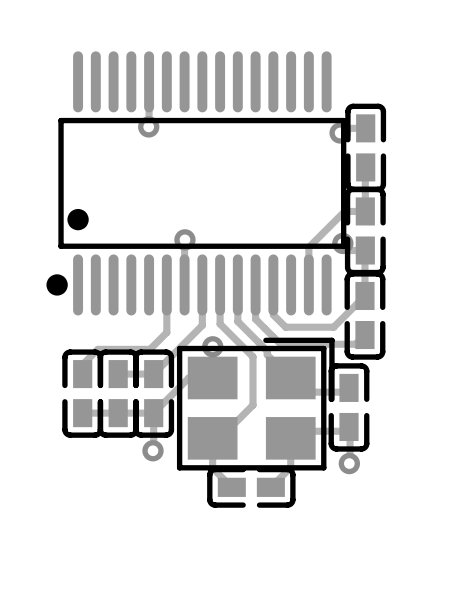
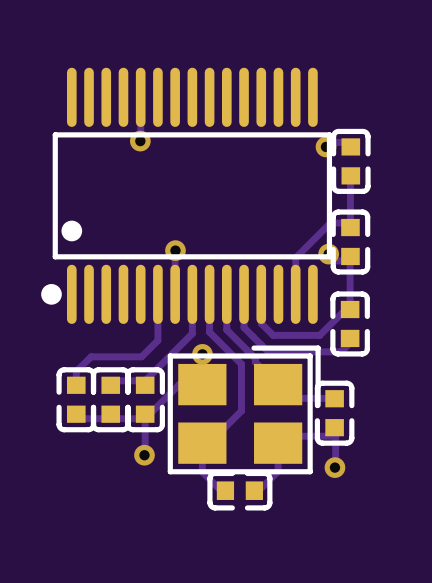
part footprint: [345, 103, 387, 193] -> [331, 128, 371, 194]
part footprint: [344, 186, 386, 276] -> [330, 209, 371, 275]
part footprint: [344, 271, 386, 360] -> [330, 291, 370, 357]
part footprint: [62, 349, 104, 438] -> [56, 367, 97, 433]
part footprint: [97, 349, 139, 438] -> [90, 367, 131, 433]
part footprint: [133, 349, 175, 438] -> [125, 367, 165, 433]
part footprint: [328, 363, 370, 452] -> [314, 380, 355, 446]
part footprint: [207, 466, 296, 508] -> [207, 470, 273, 511]

